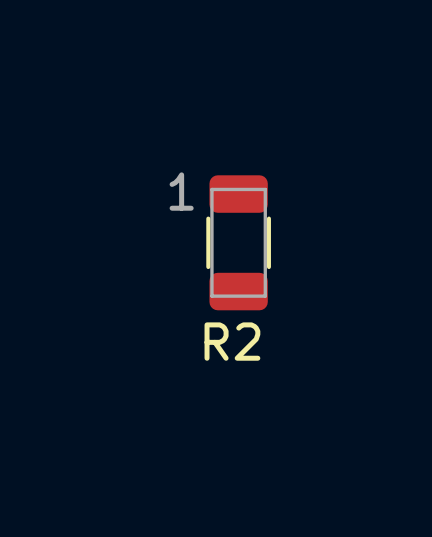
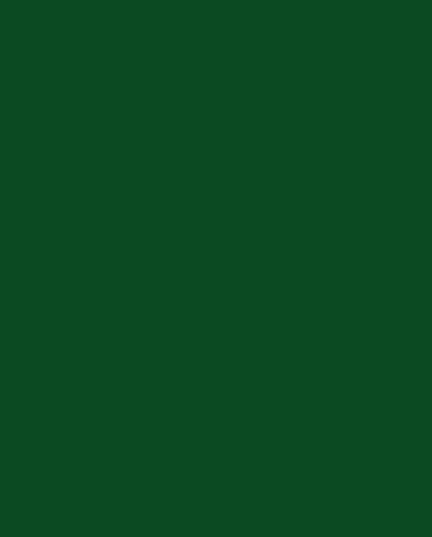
R2: 1 (238, 242) -> none

